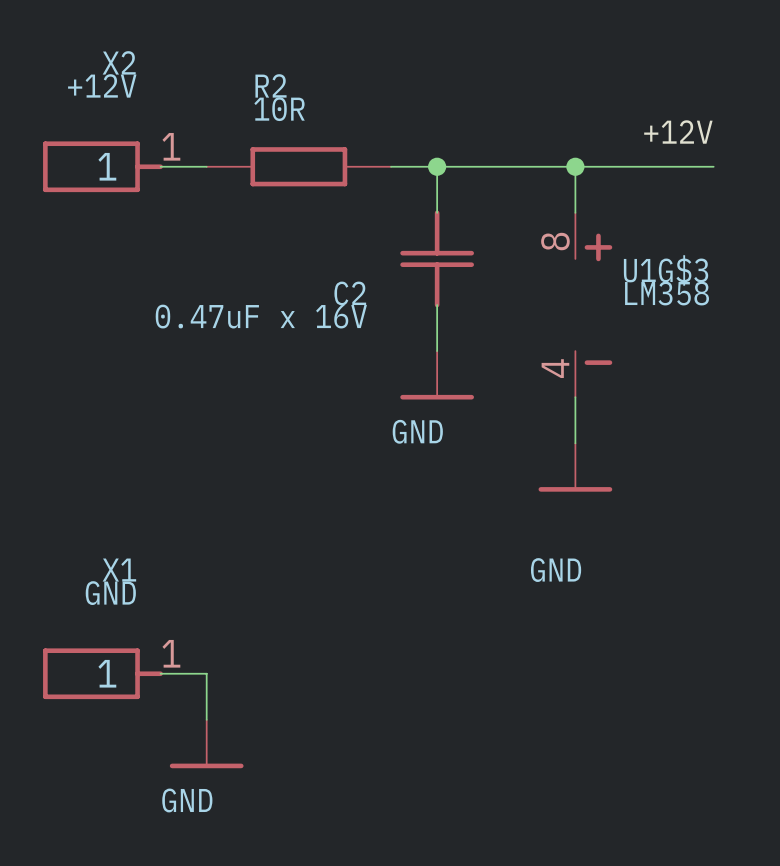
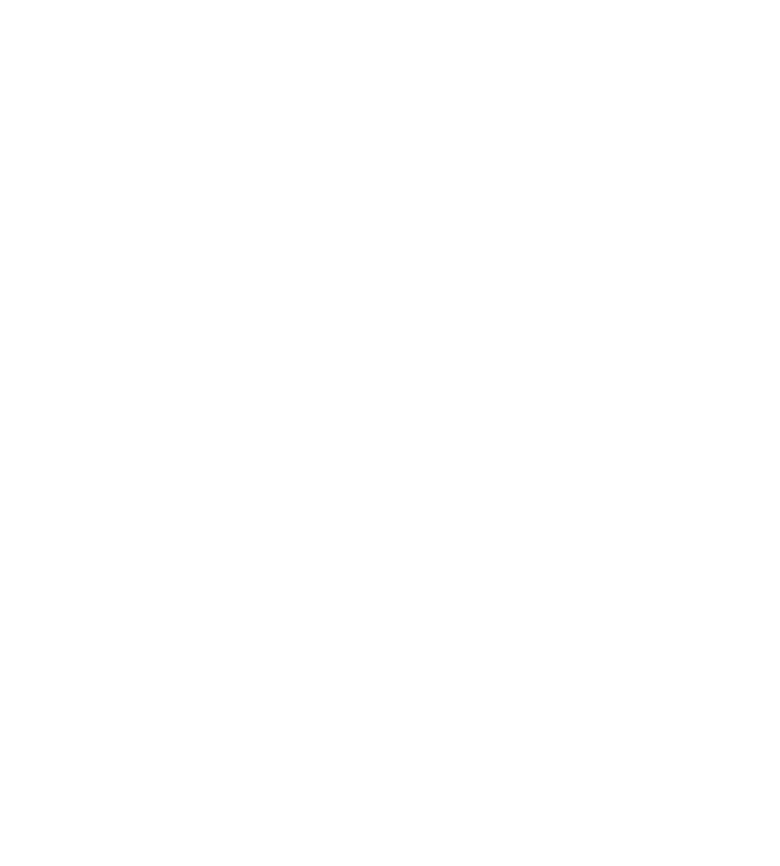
label: +12V (678, 131) -> none
X2: +12V (102, 166) -> none
wire: (160, 166) (206, 166) -> none
R2: 10R (298, 166) -> none
wire: (391, 166) (713, 166) -> none
wire: (437, 166) (437, 212) -> none
junction: (437, 166) -> none
wire: (575, 166) (575, 212) -> none
junction: (575, 166) -> none
C2: 0.47uF x 16V (437, 258) -> none
wire: (437, 305) (437, 351) -> none
U1G$3: LM358 (593, 305) -> none
power symbol: GND (437, 375) -> none
wire: (575, 397) (575, 443) -> none
power symbol: GND (575, 467) -> none
X1: GND (102, 673) -> none
wire: (160, 673) (206, 673) (206, 719) -> none
power symbol: GND (206, 744) -> none

